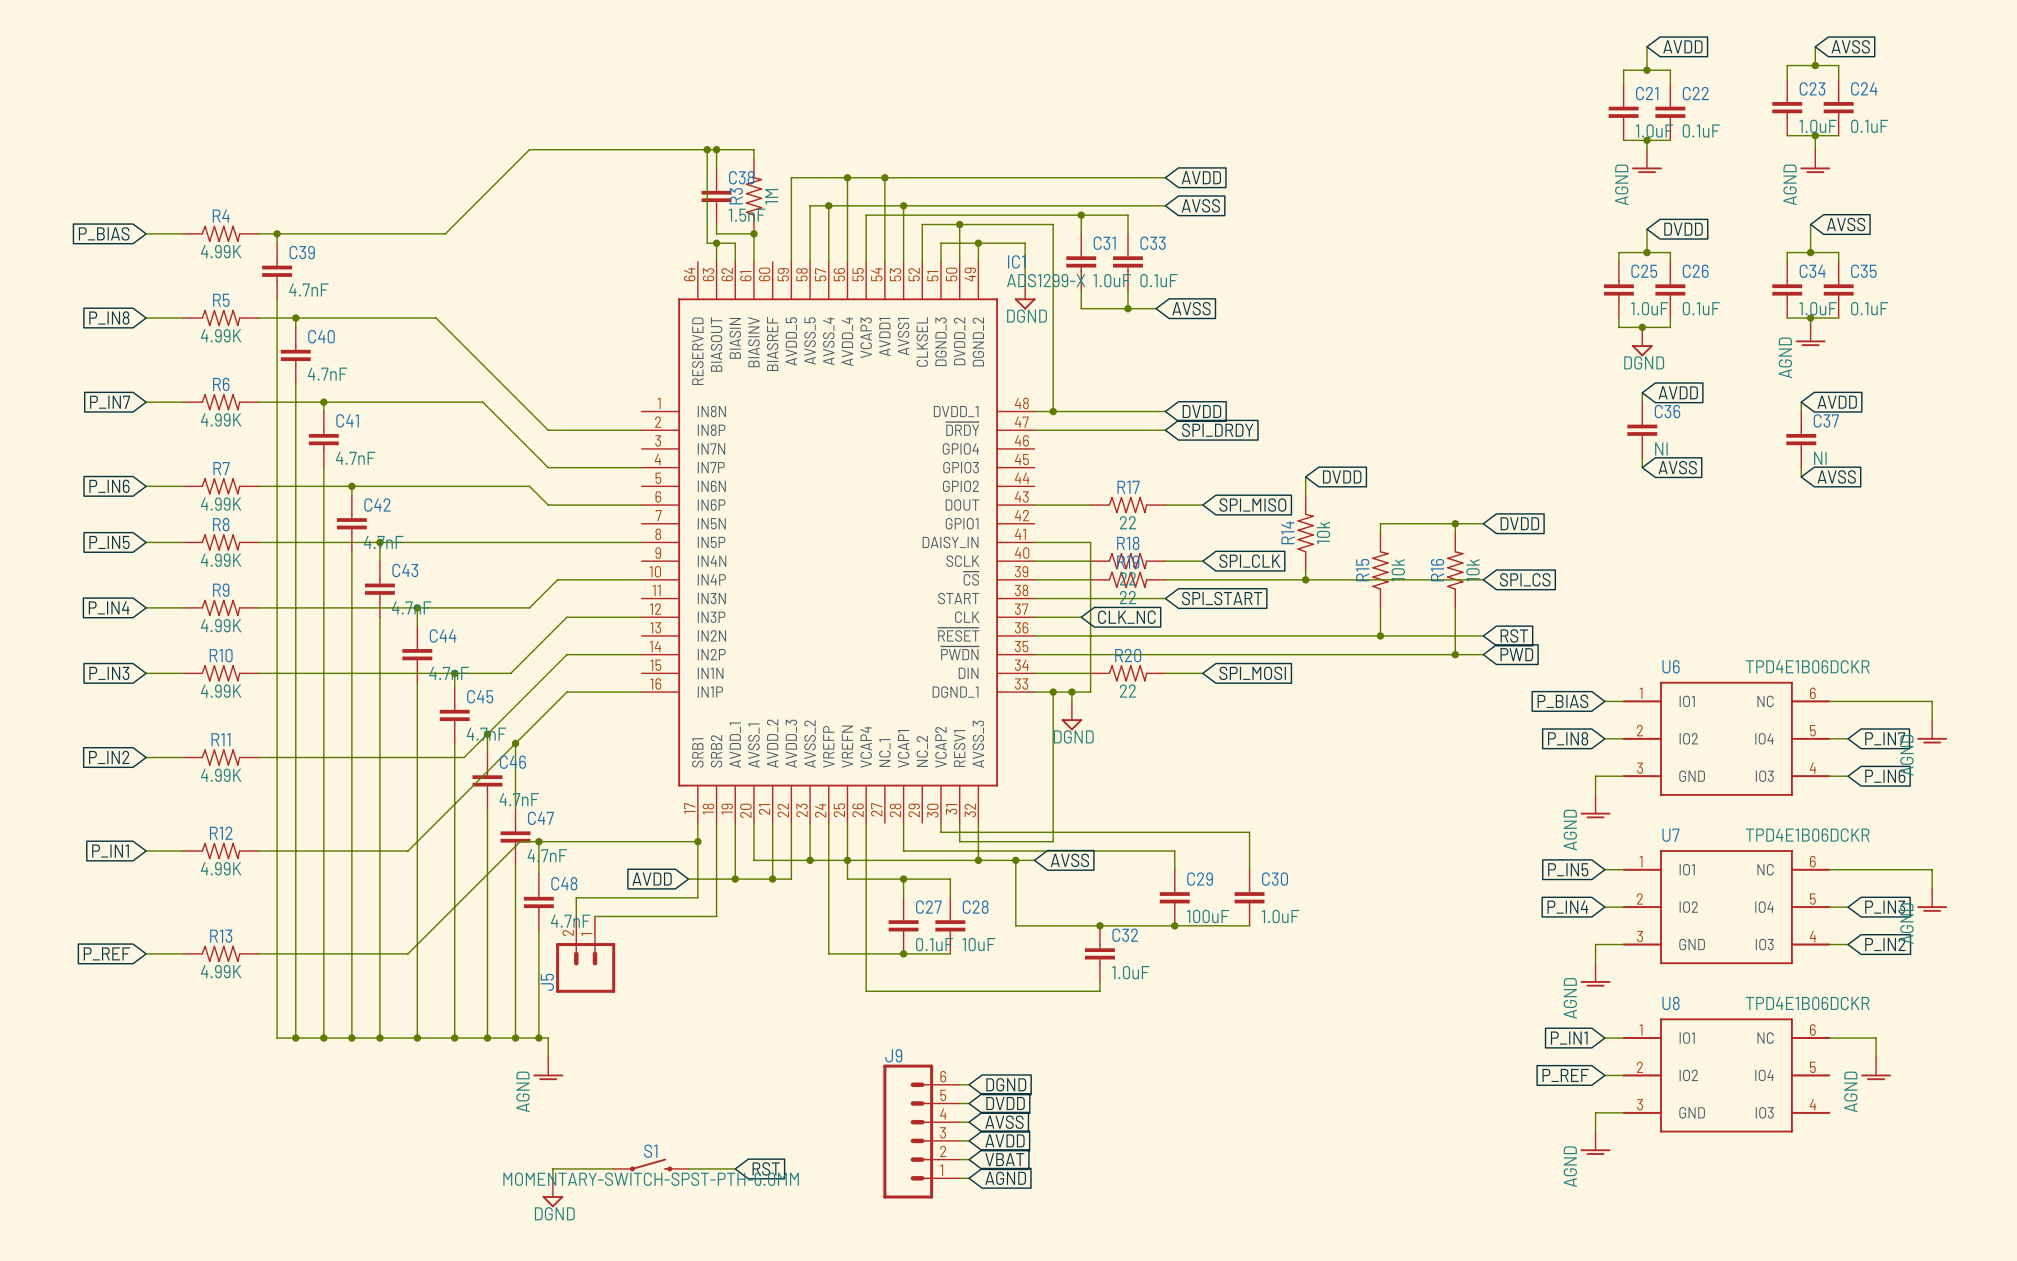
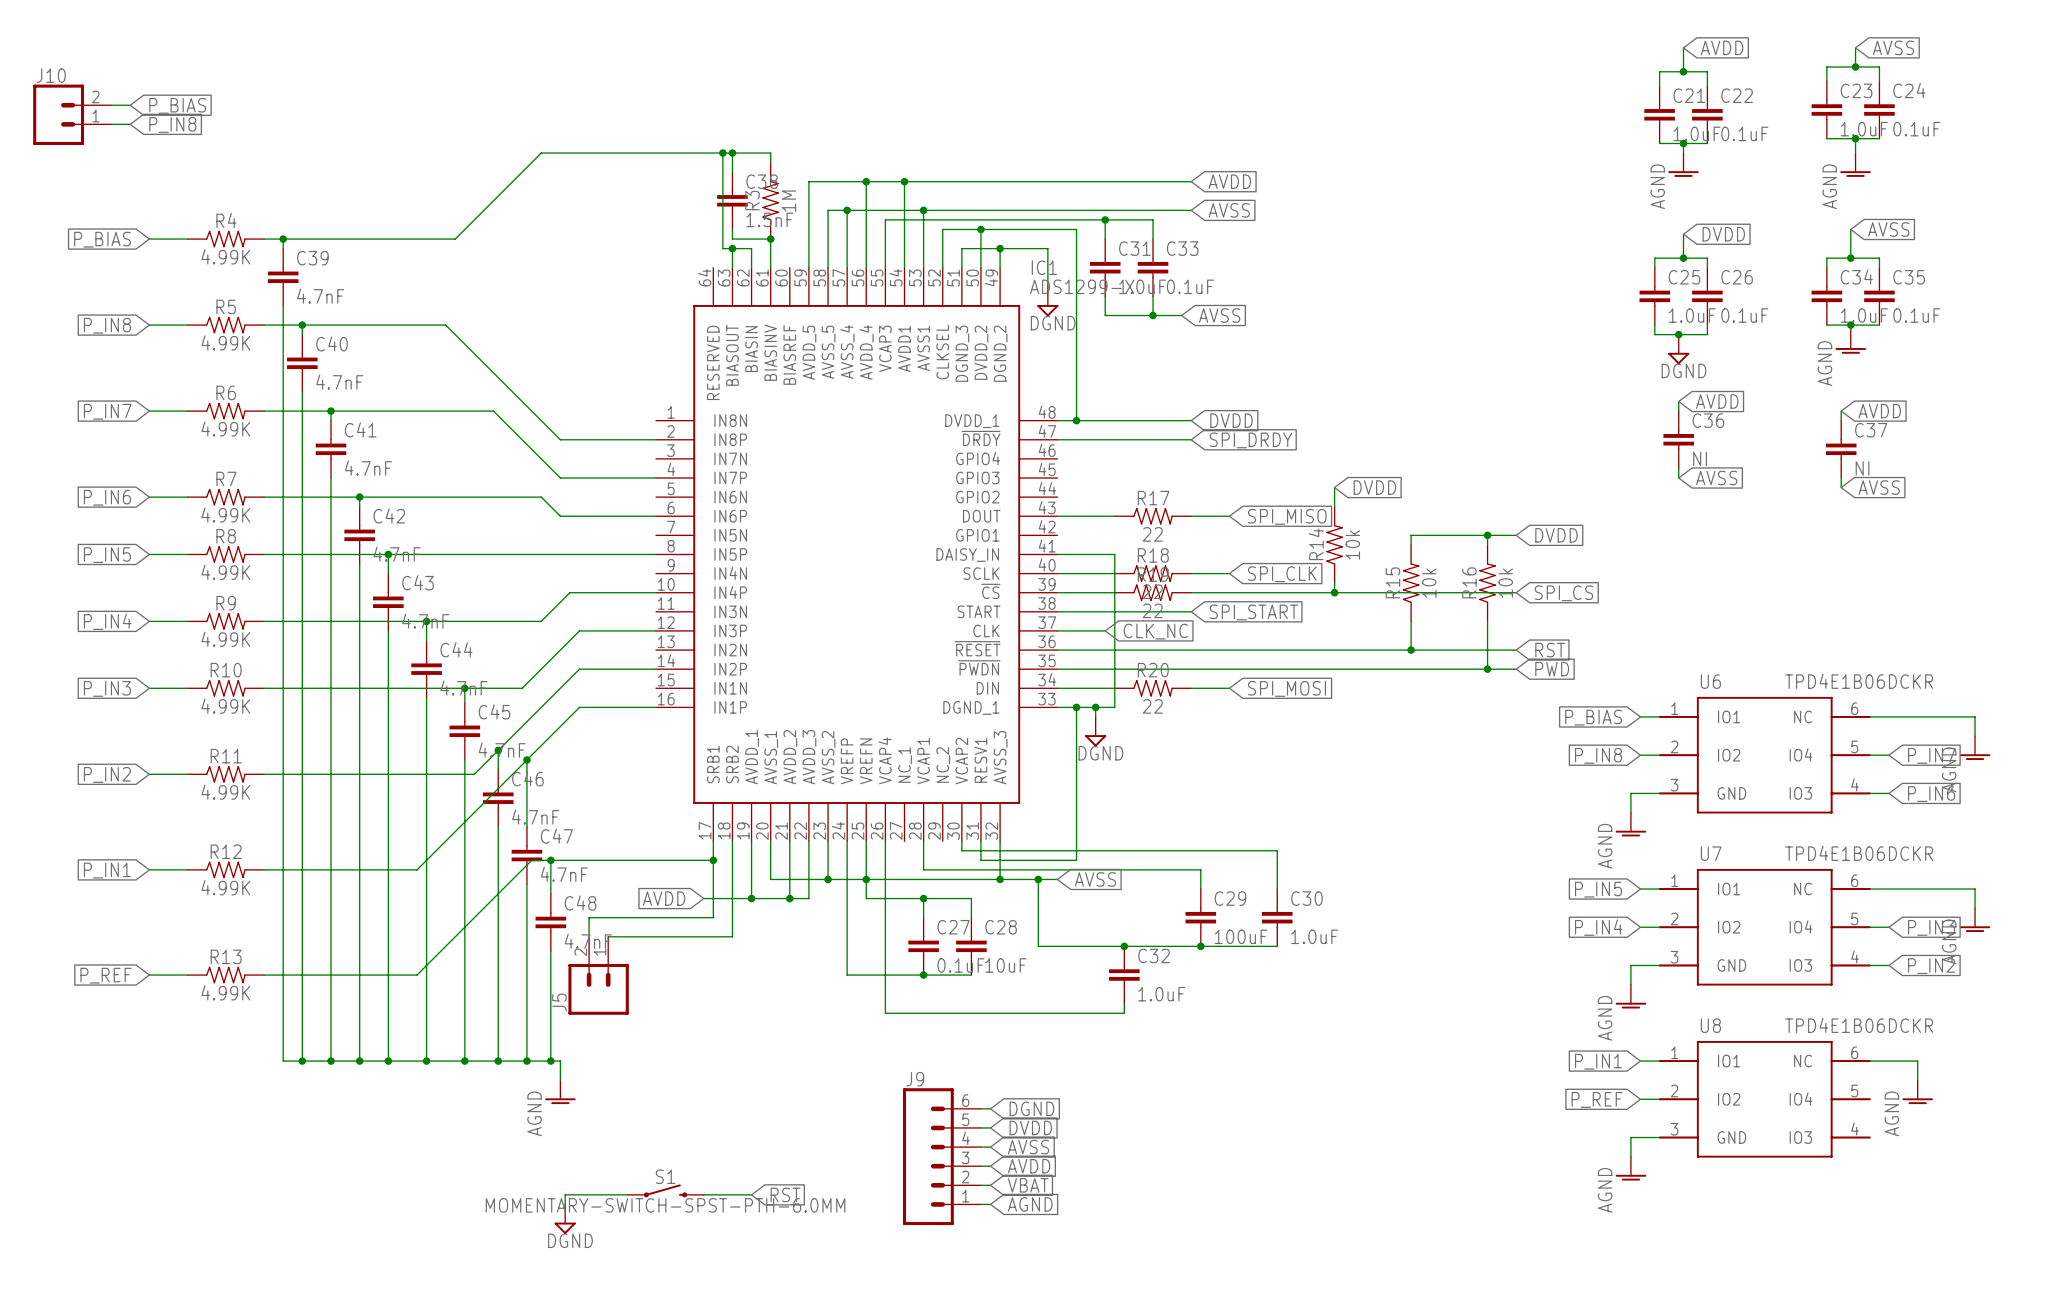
wire: none -> (111, 105) (130, 105)
global label: none -> P_BIAS (177, 105)
J10: none -> (72, 114)
wire: none -> (111, 124) (130, 124)
global label: none -> P_IN8 (172, 124)

